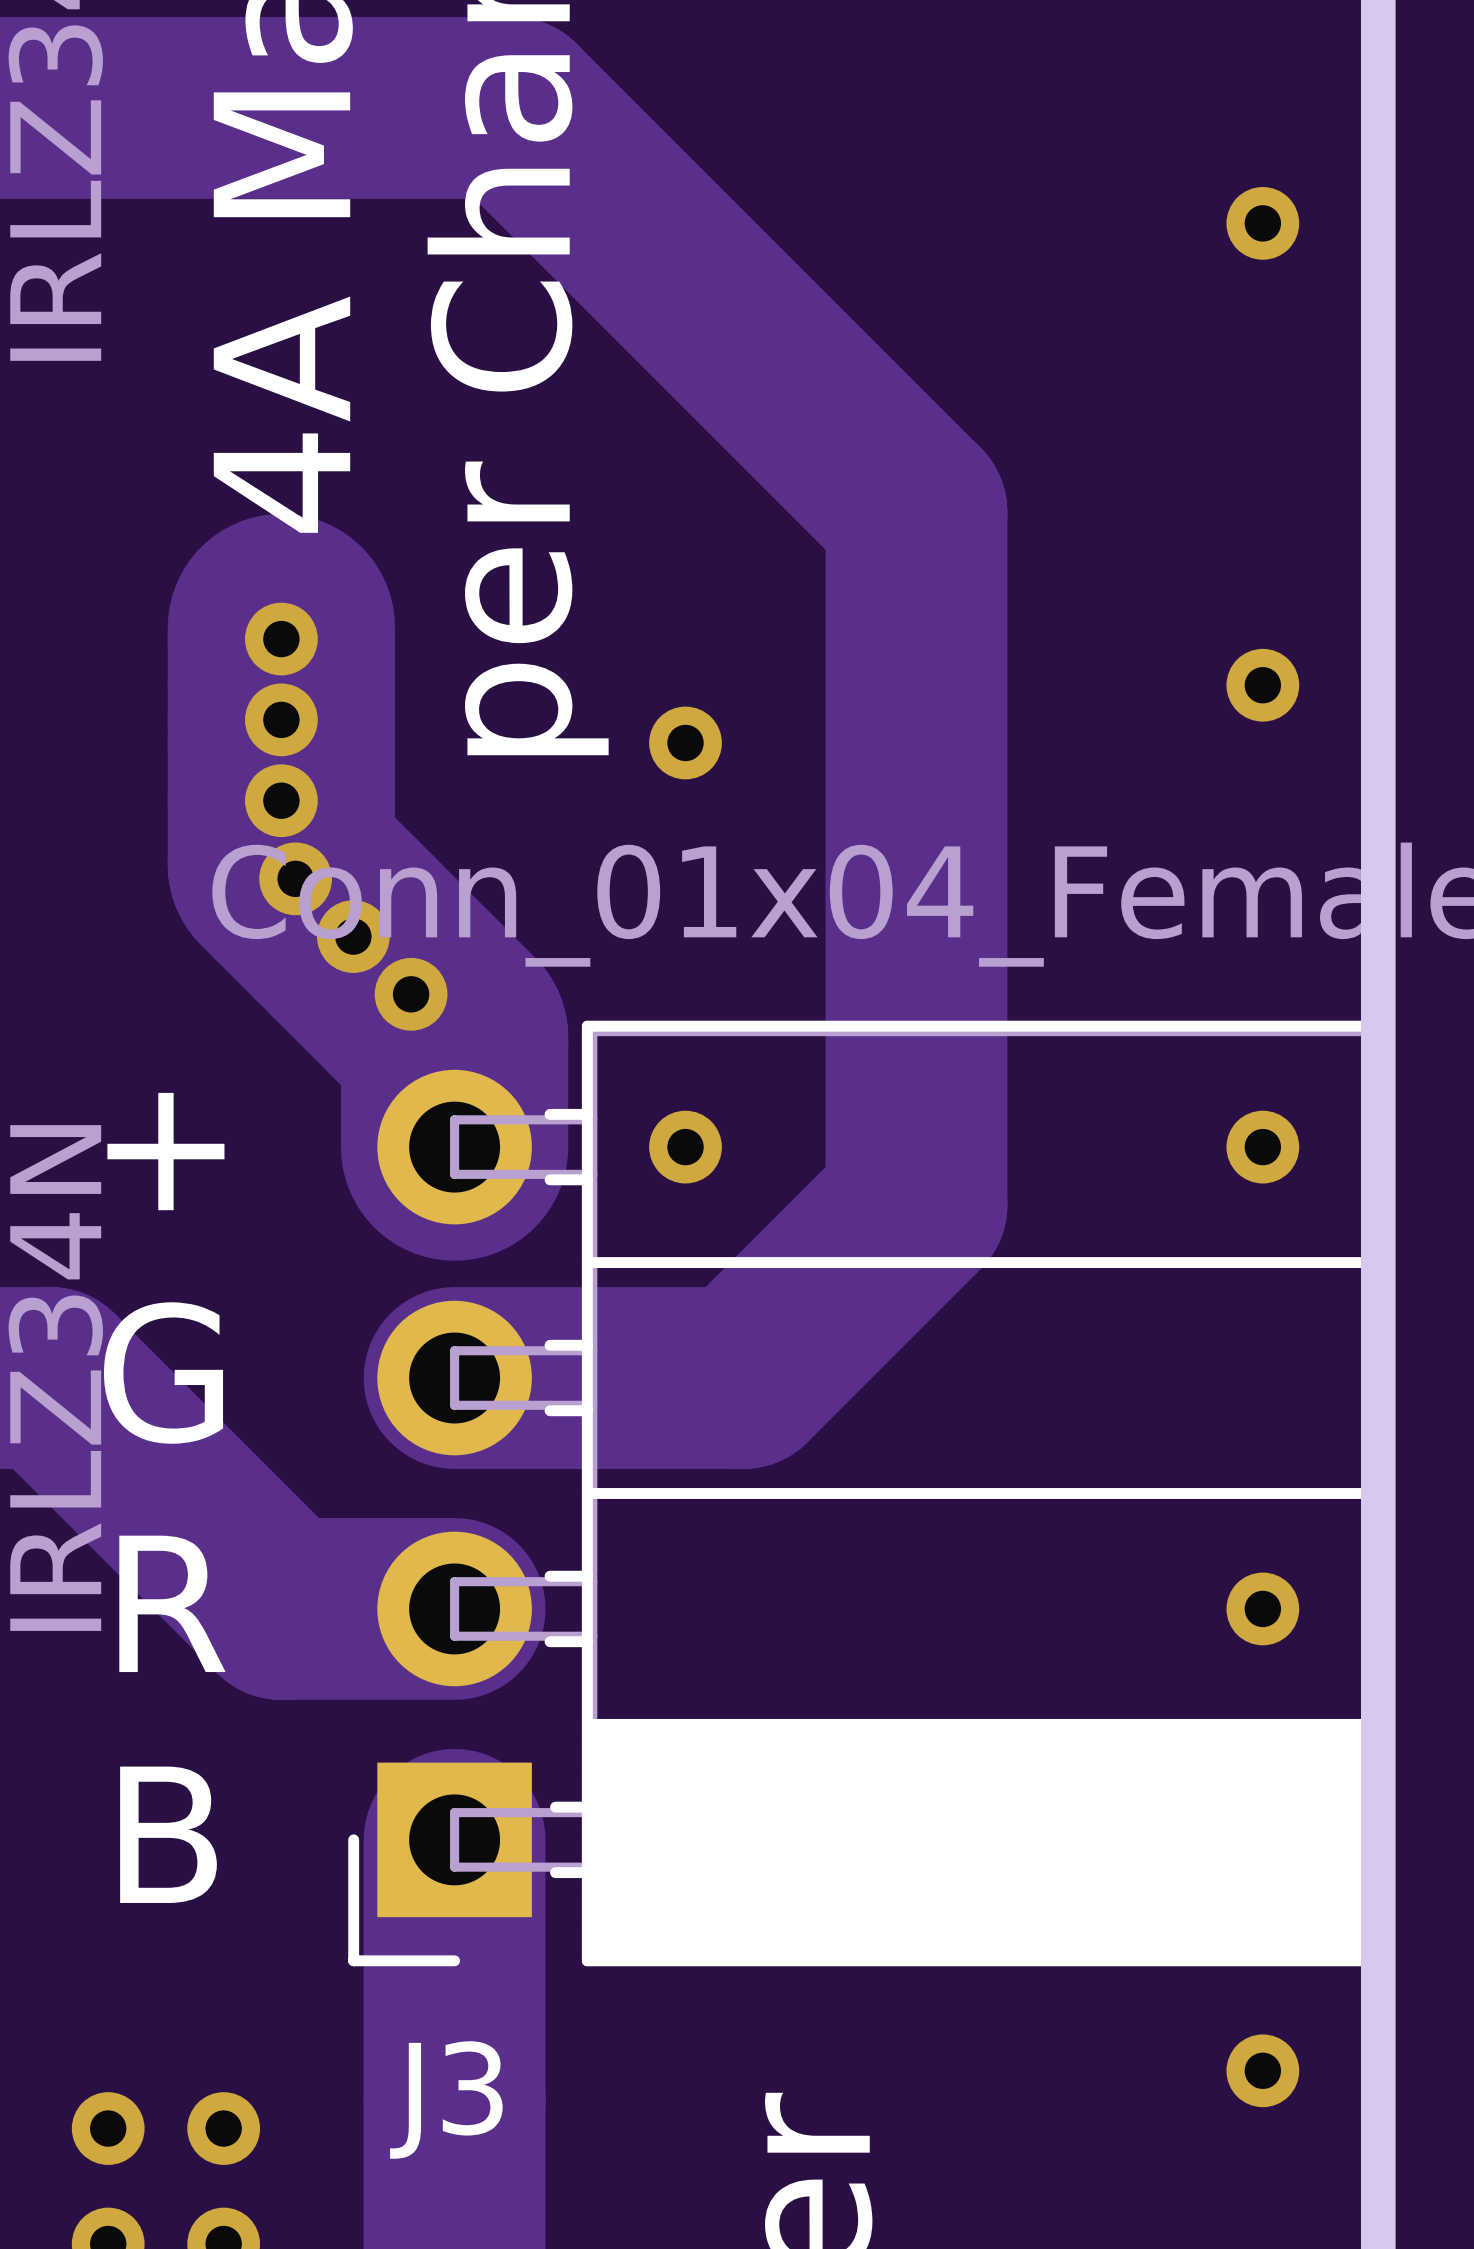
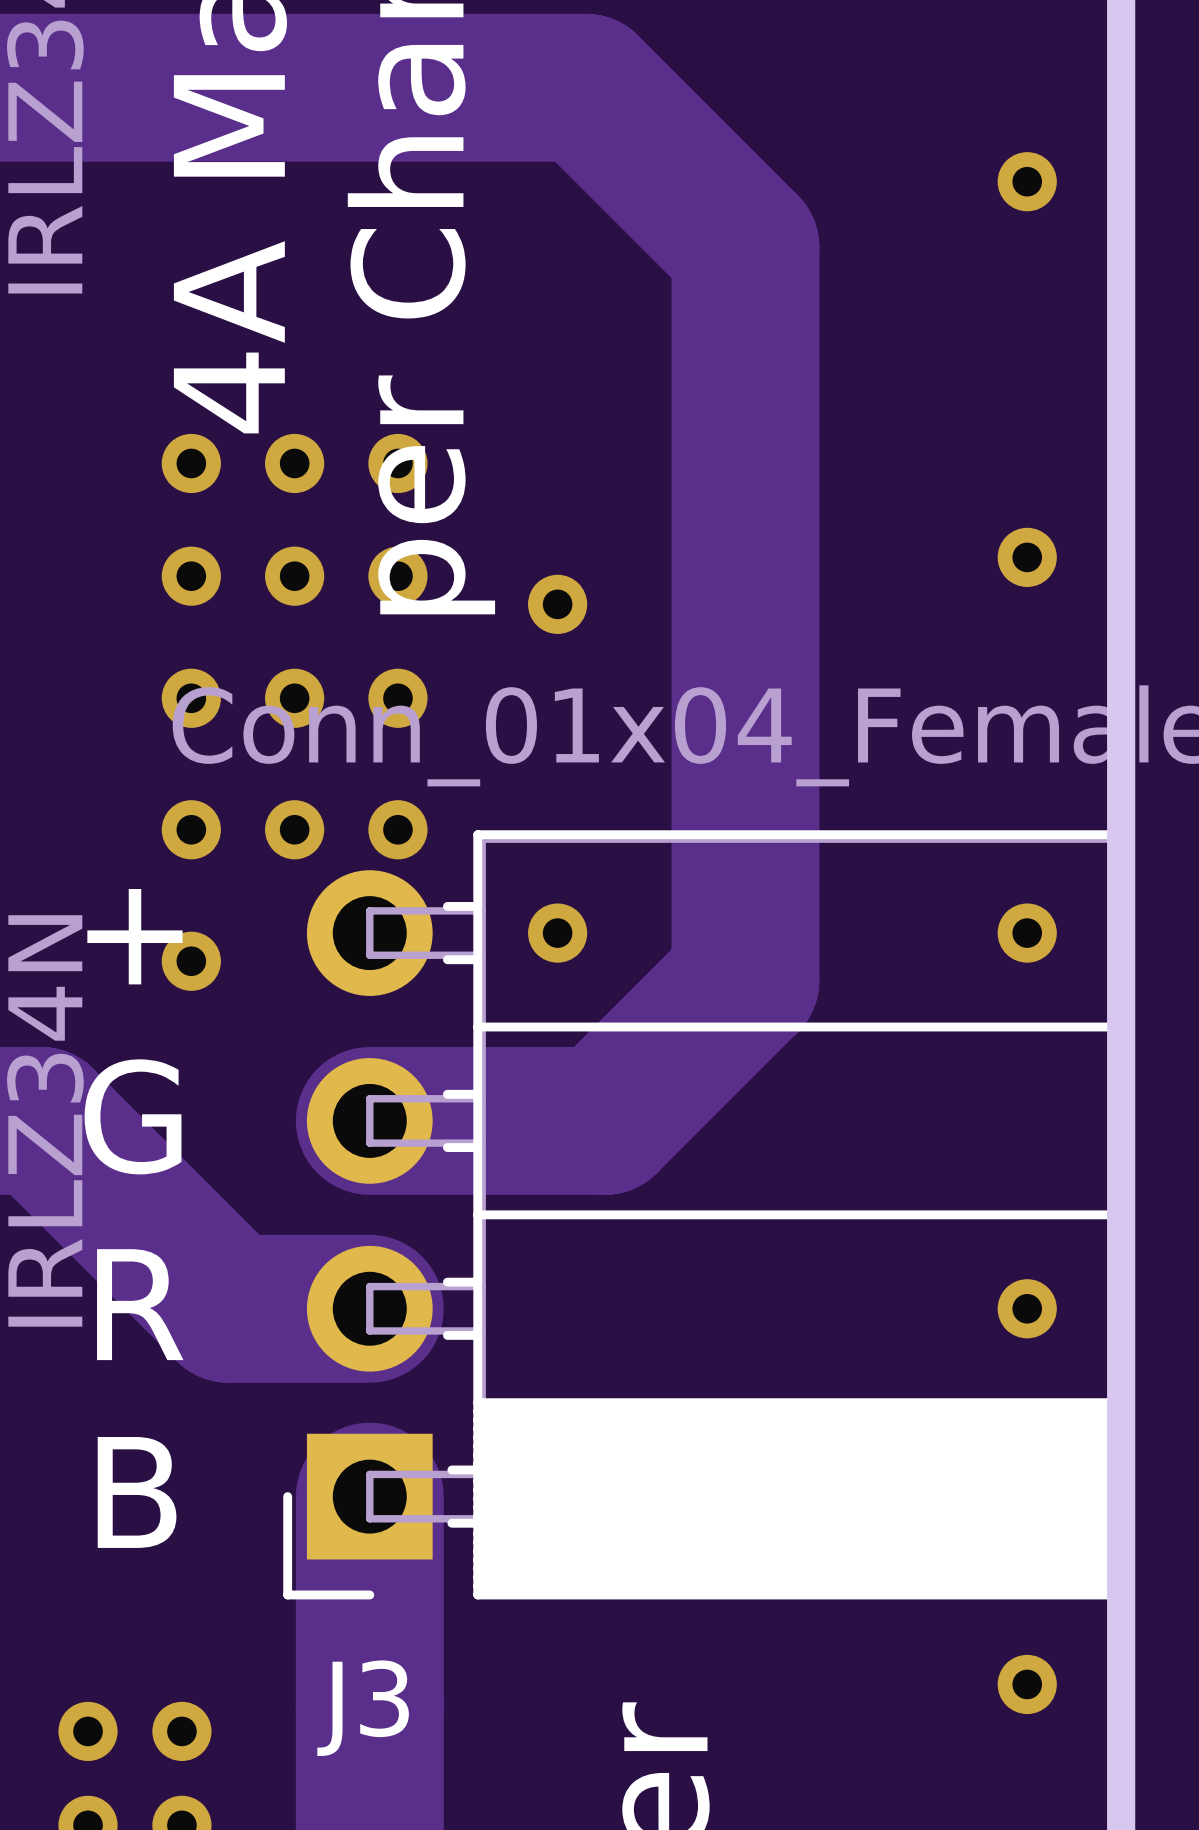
track: (512, 107) (916, 512) -> (416, 87) (585, 87) (745, 247) (745, 416)
via: none -> (191, 463)
via: none -> (294, 463)
via: none -> (397, 463)
track: (281, 627) (281, 864) (454, 1037) (454, 1147) -> none
via: (281, 639) -> none
via: none -> (191, 576)
via: none -> (294, 576)
via: none -> (397, 576)
via: (281, 719) -> none
via: (281, 800) -> none
via: none -> (191, 698)
via: none -> (294, 698)
via: none -> (397, 698)
via: (295, 878) -> none
via: (353, 936) -> none
via position: (411, 994) -> (294, 829)
via: none -> (191, 829)
via: none -> (397, 829)
via: none -> (191, 961)

